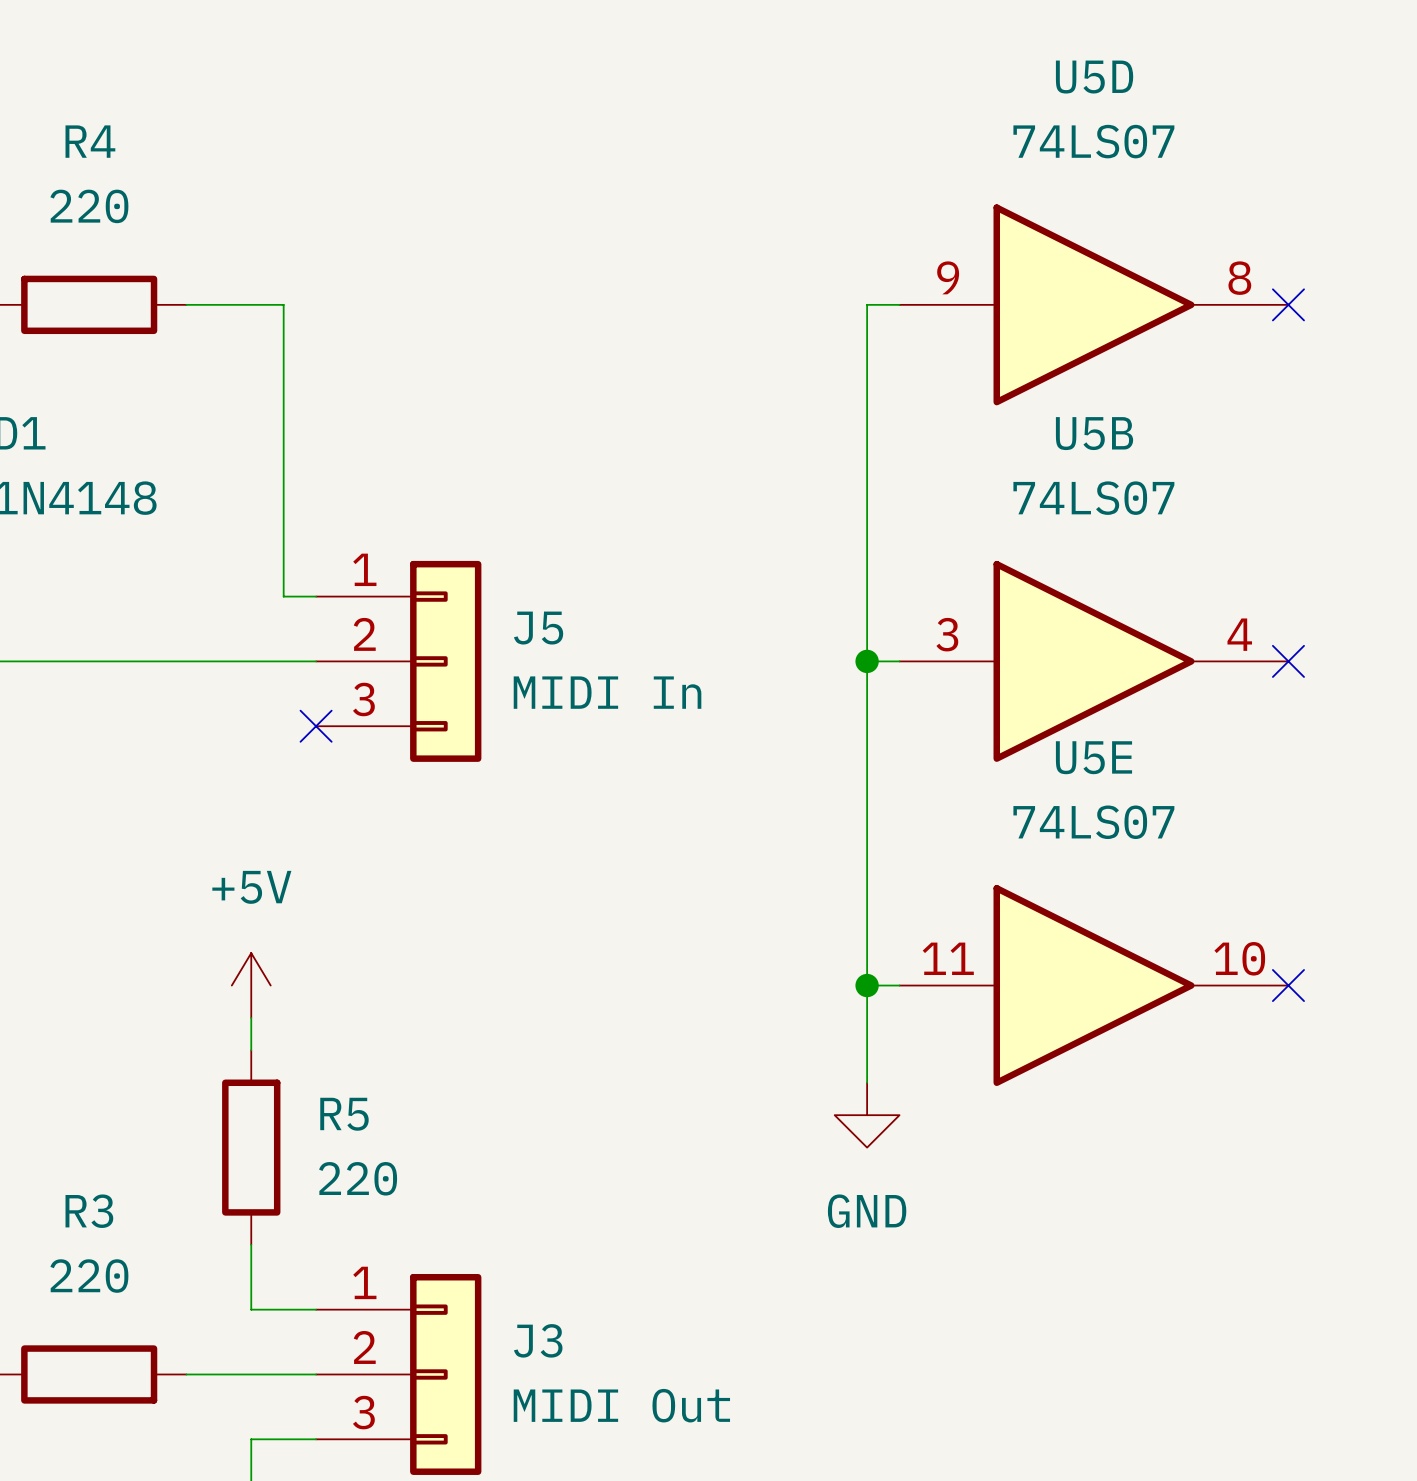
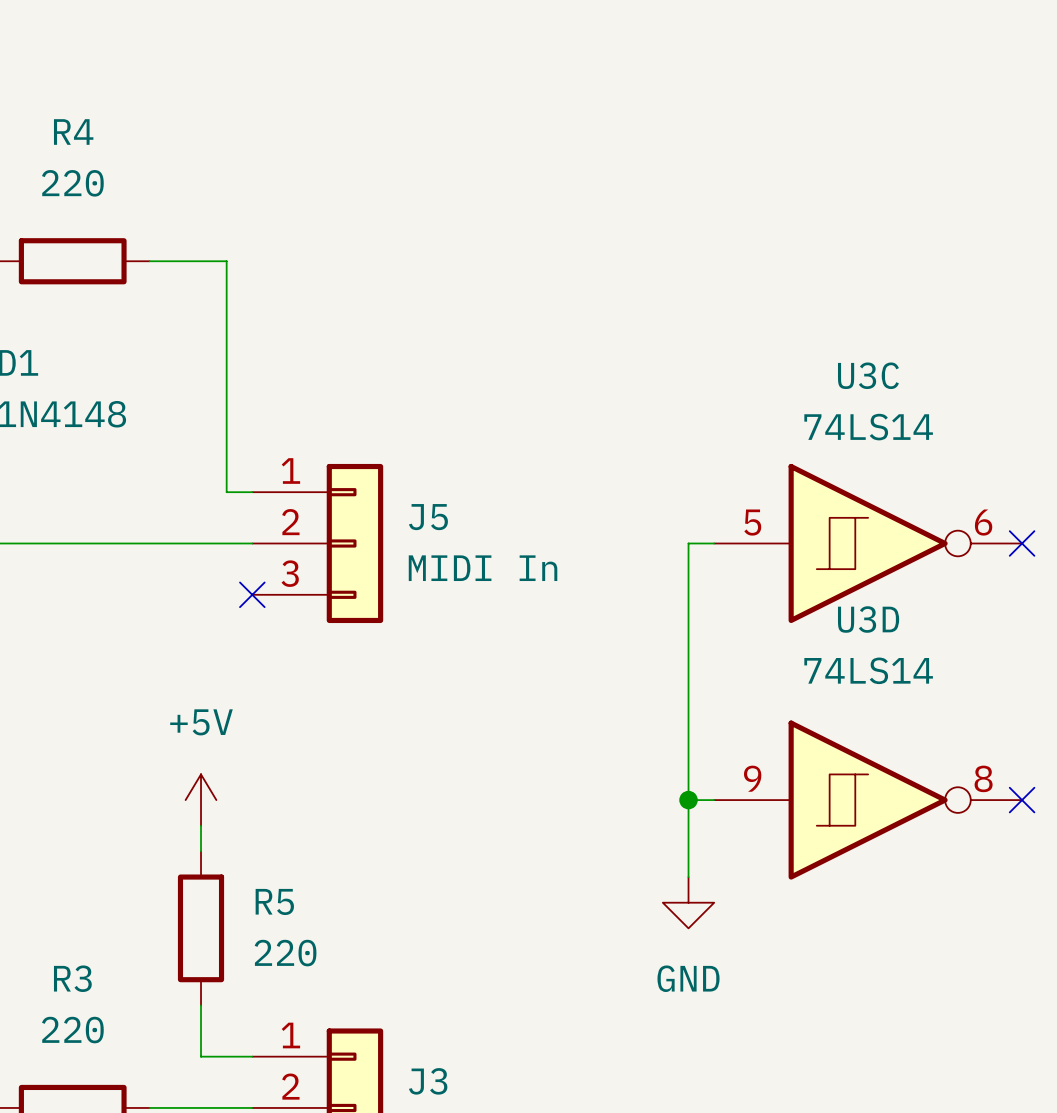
wire: (899, 304) (867, 304) (867, 661) -> none
U5D: 74LS07 (1093, 304) -> none
no-connect mark: (1288, 304) -> none
junction: (867, 661) -> none
U5B: 74LS07 (1093, 661) -> none
U3C: none -> 74LS14 (868, 543)
U5E: 74LS07 (1093, 985) -> none
U3D: none -> 74LS14 (868, 800)

